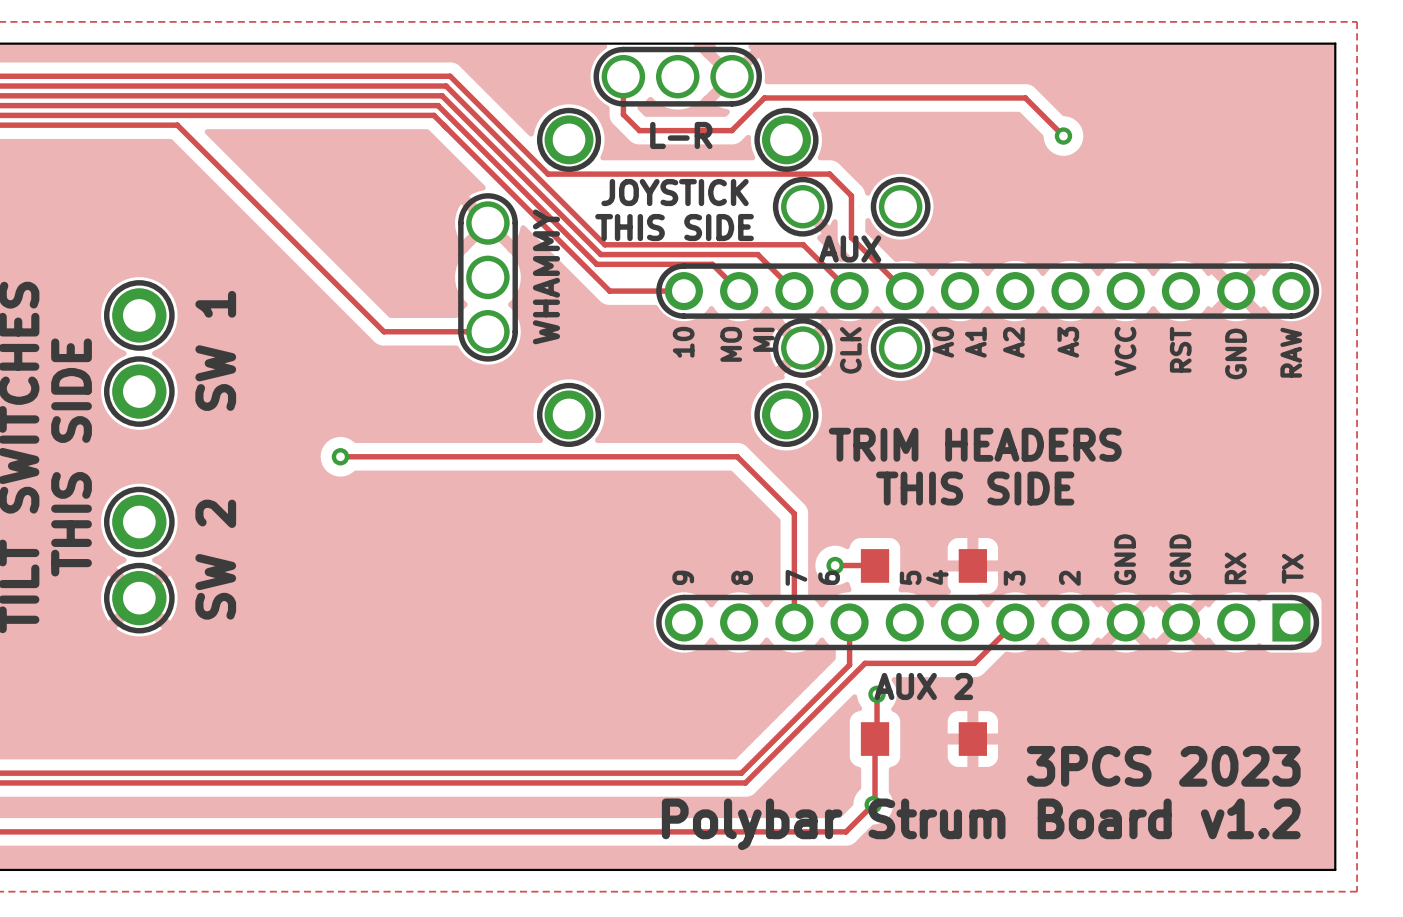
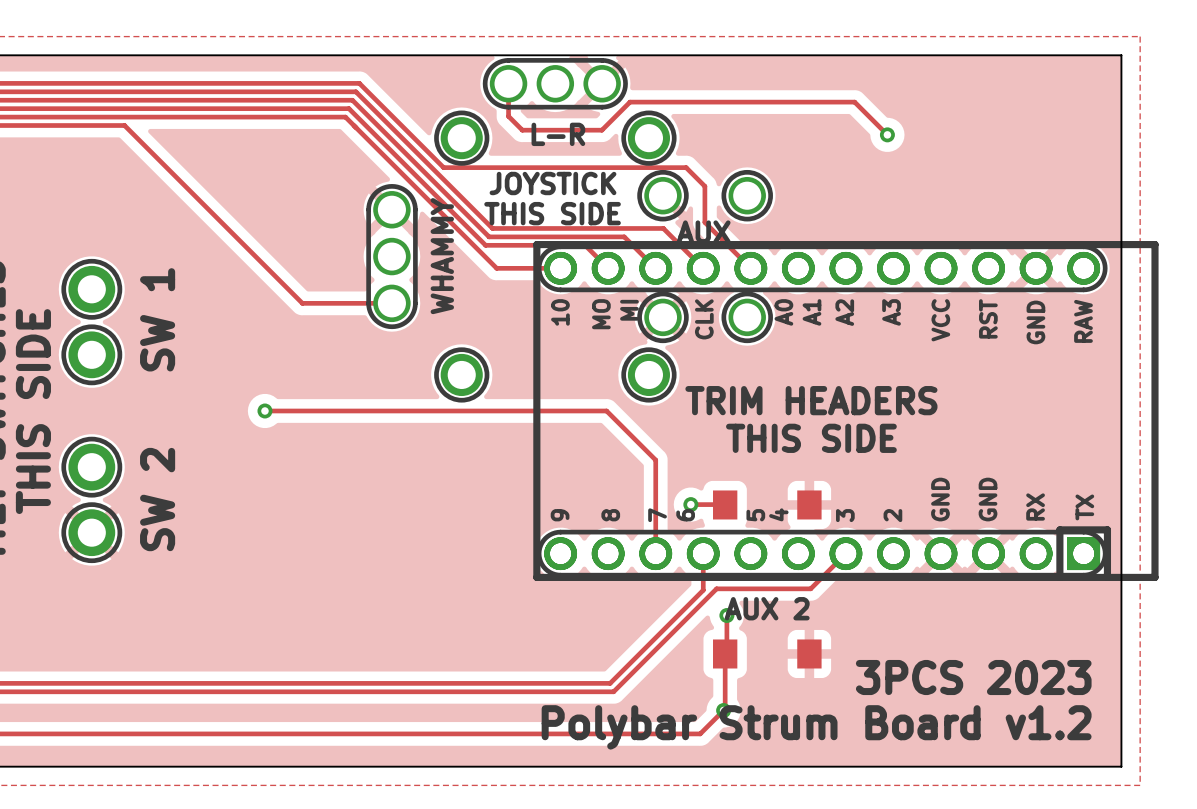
part: none -> (845, 410)

